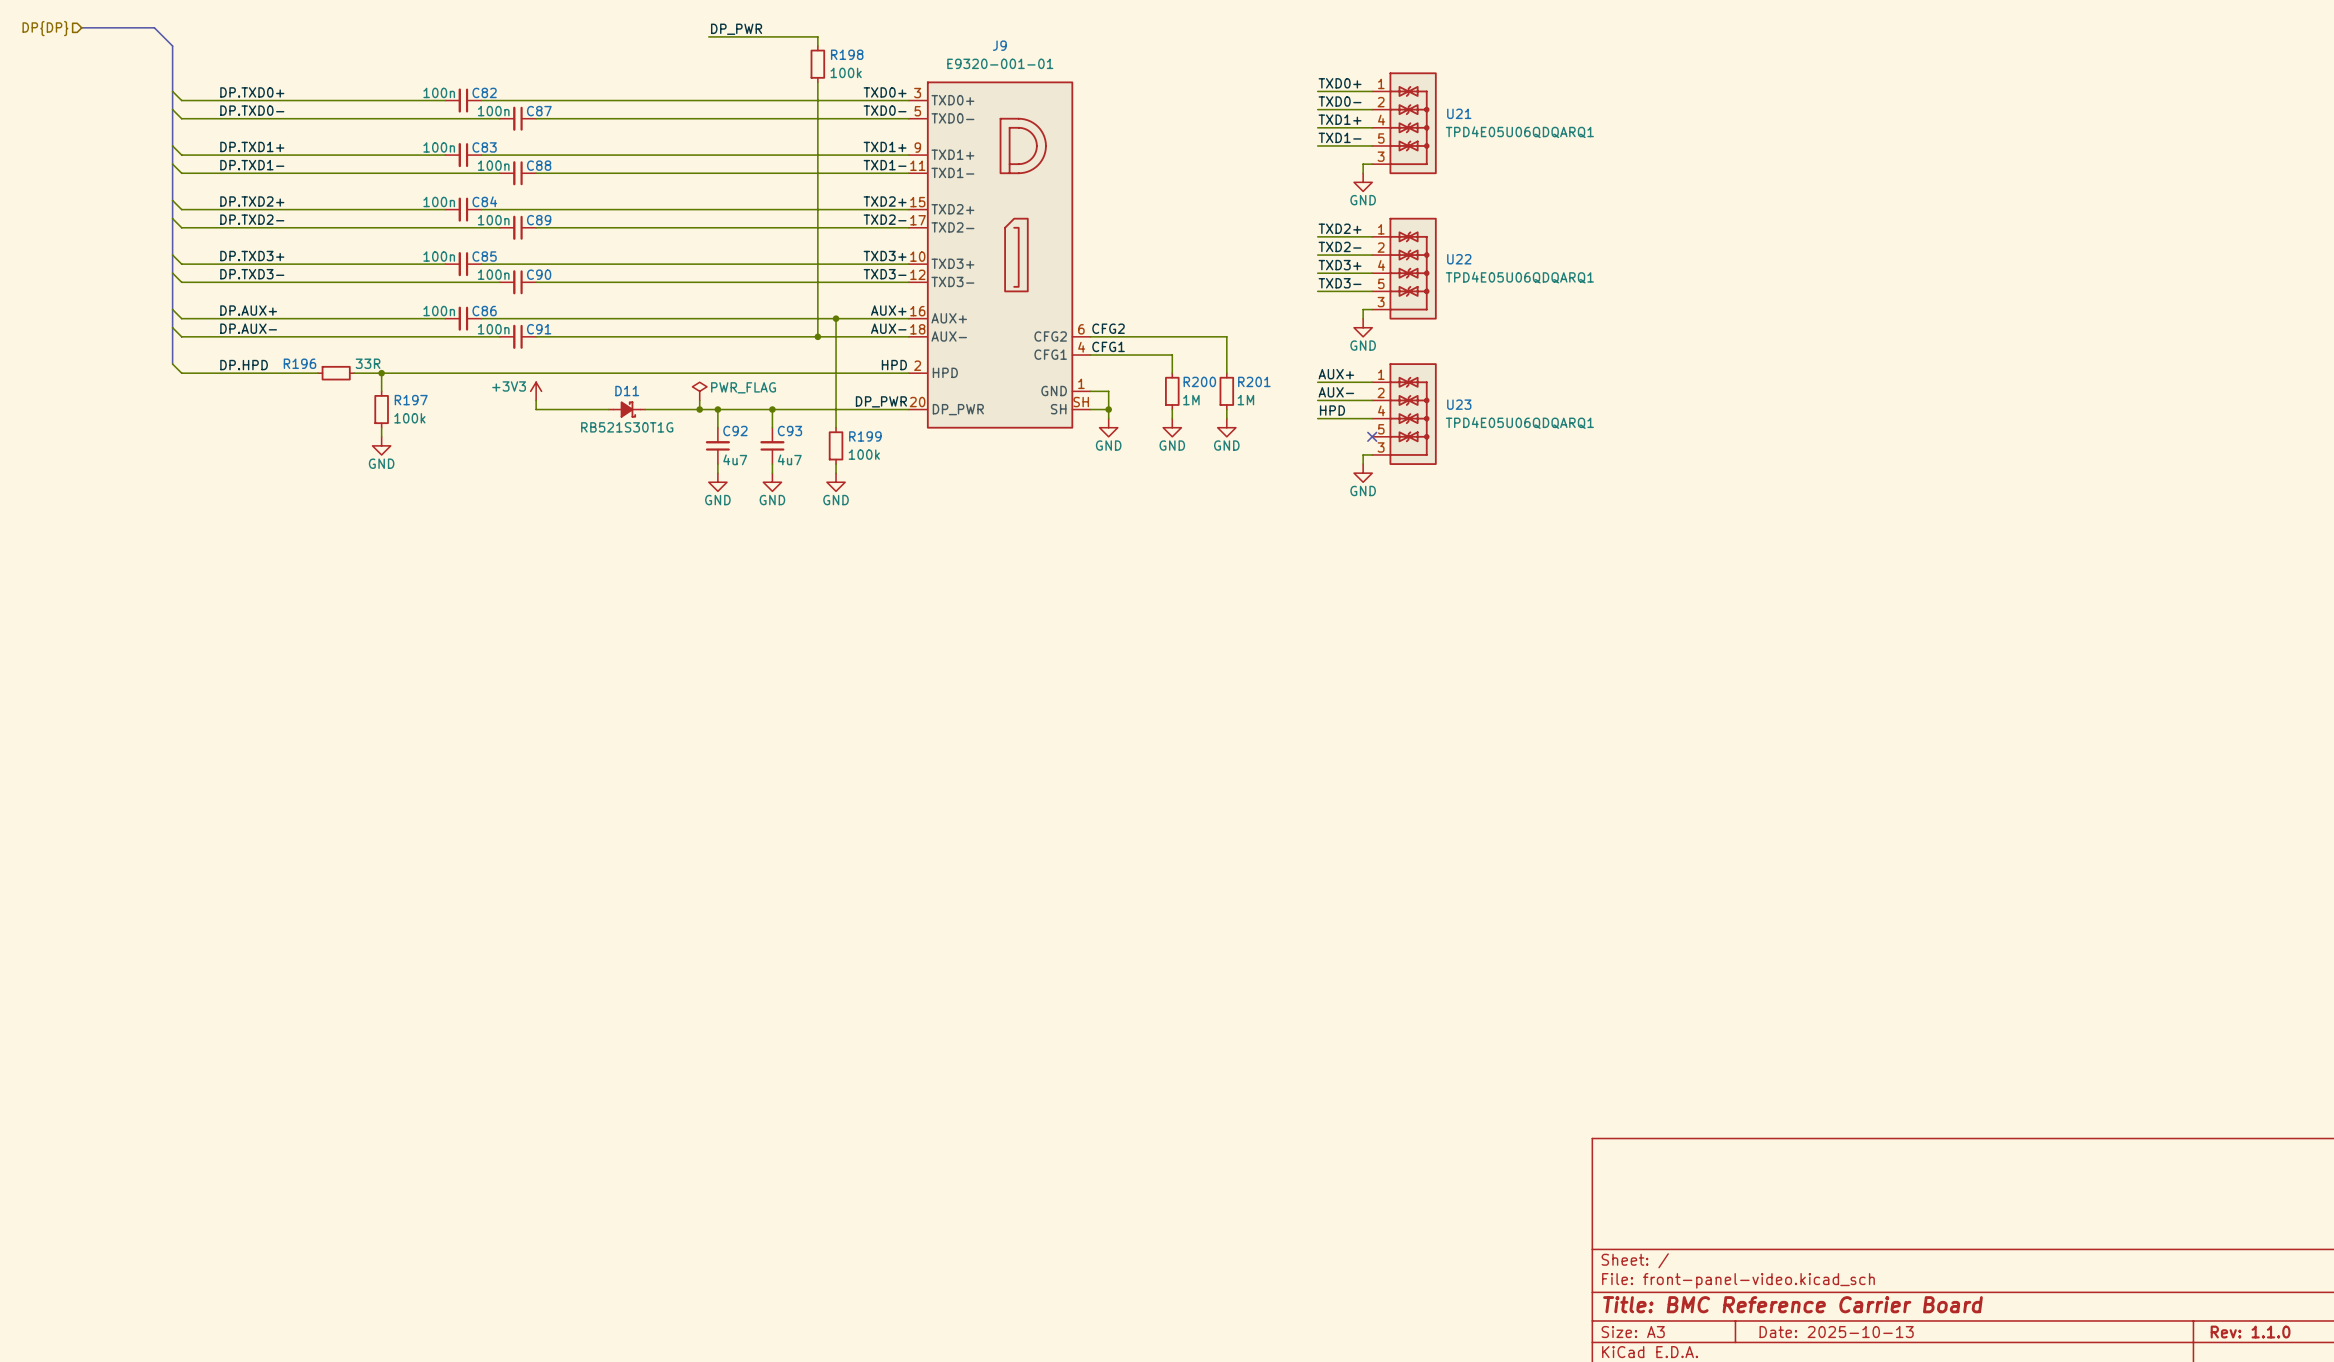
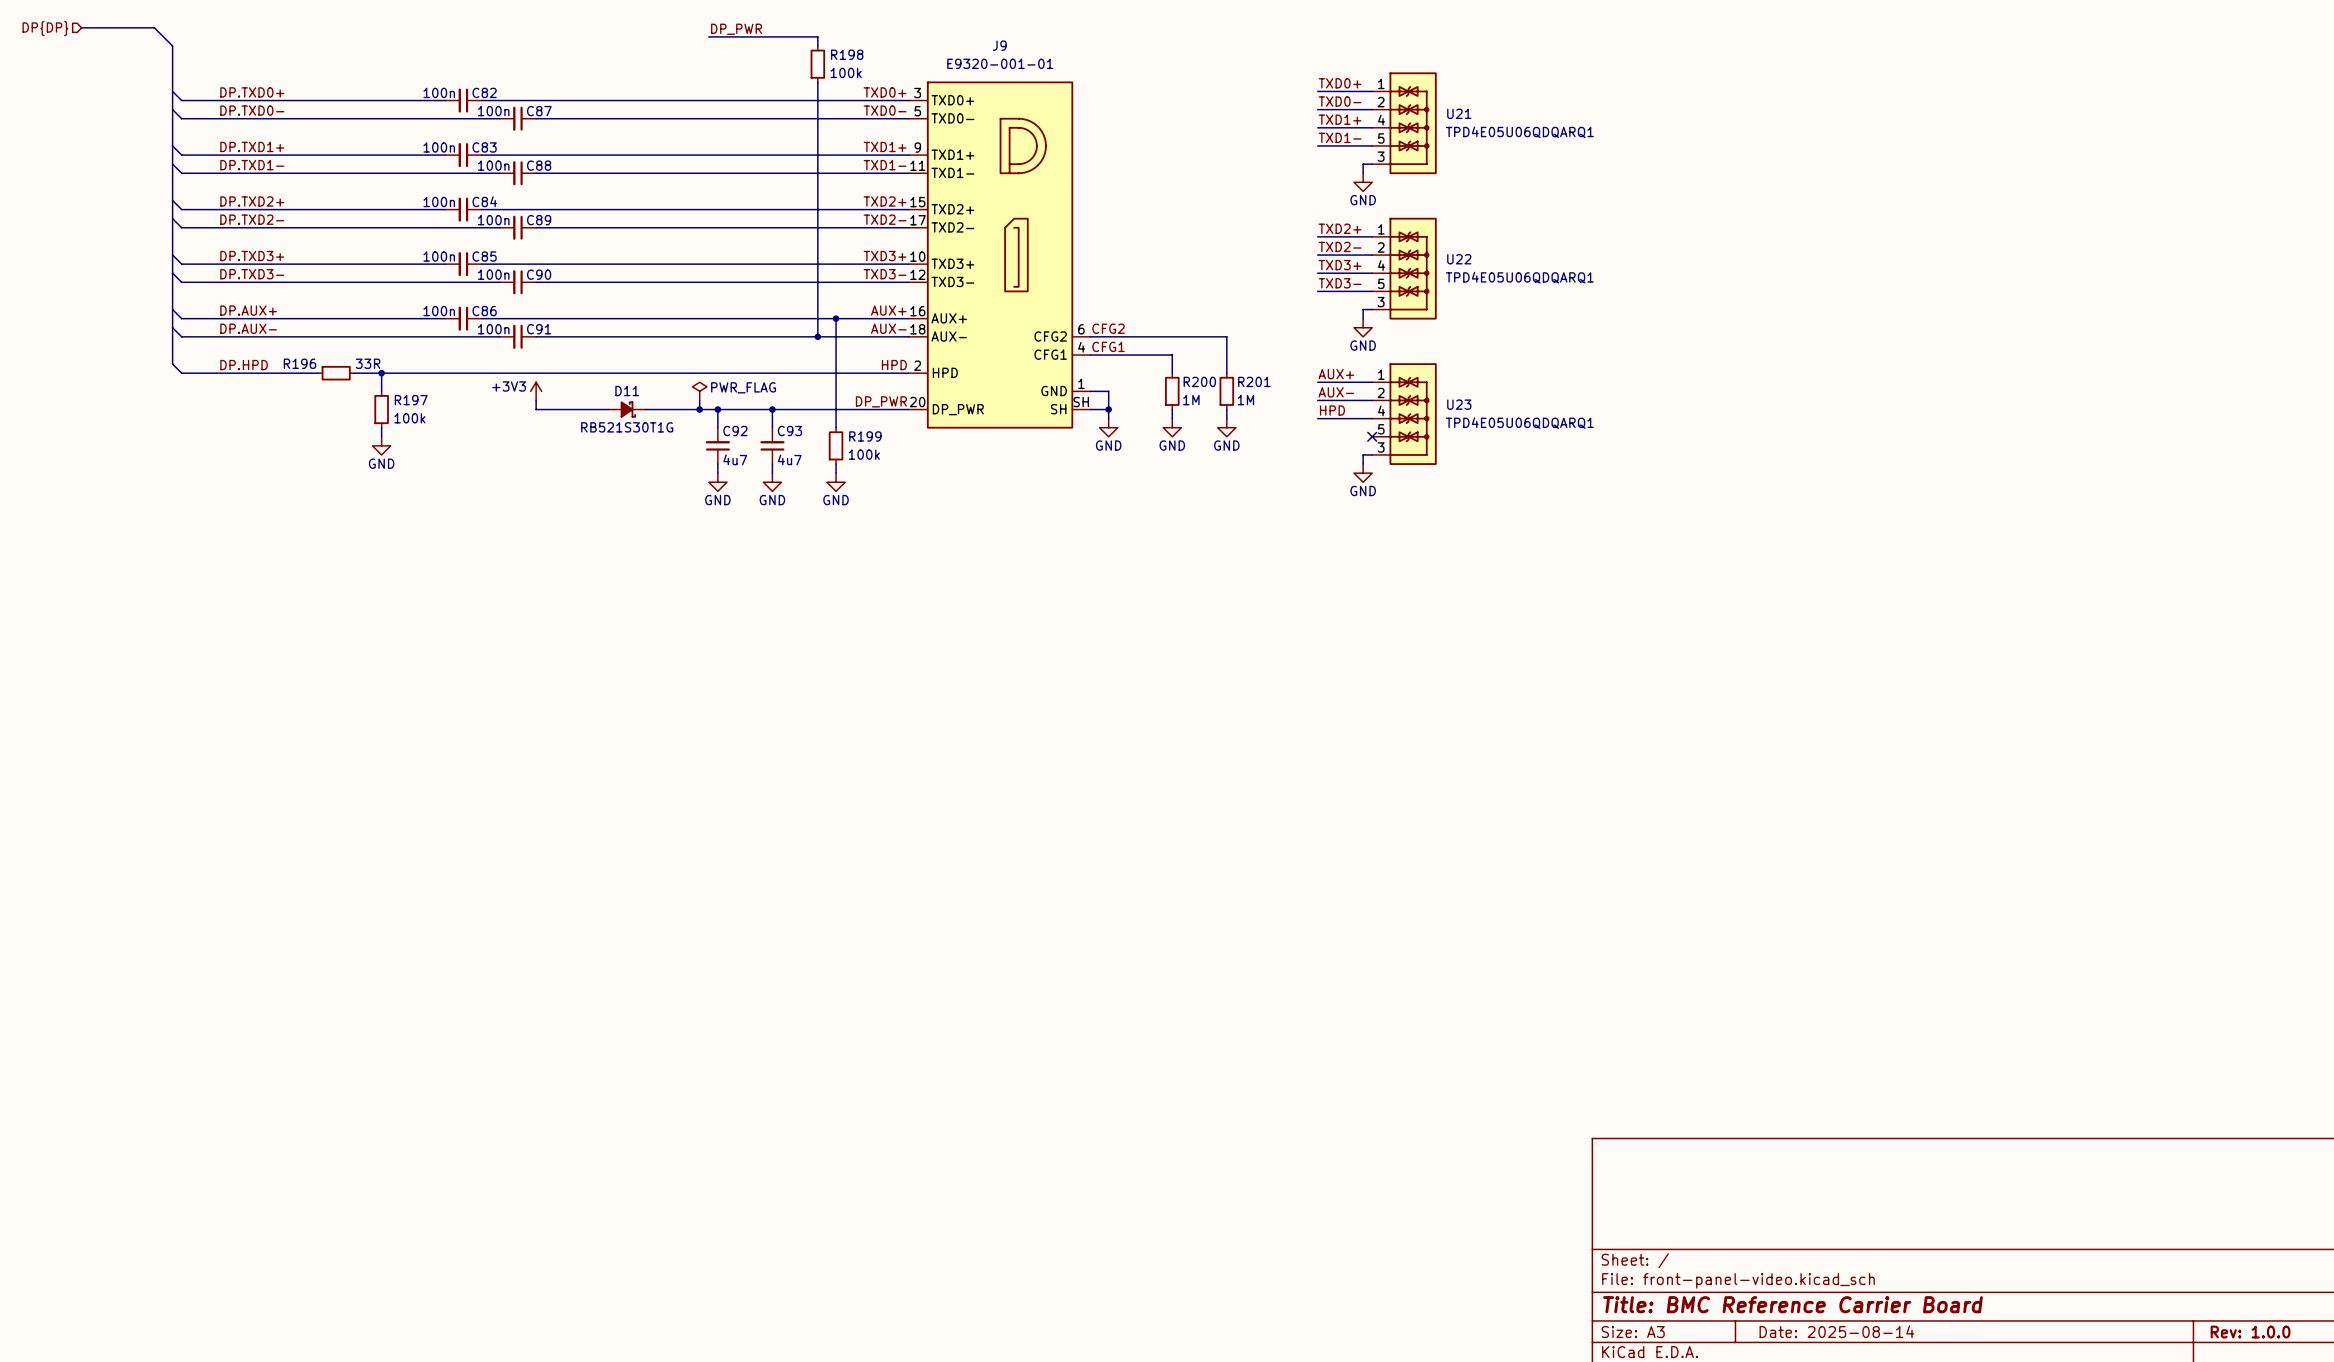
title block: Date: 2025-10-13 (1836, 1332) -> Date: 2025-08-14 (1836, 1331)
title block: Rev: 1.1.0 (2250, 1332) -> Rev: 1.0.0 (2250, 1332)

